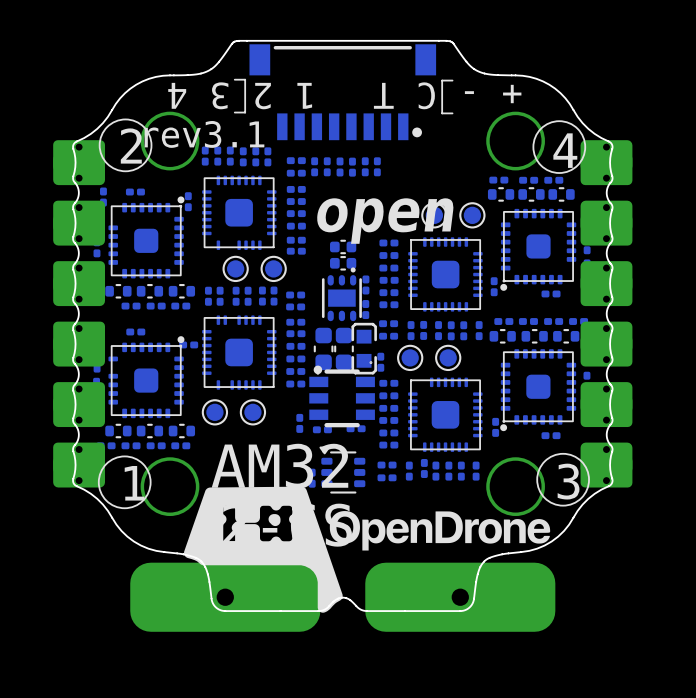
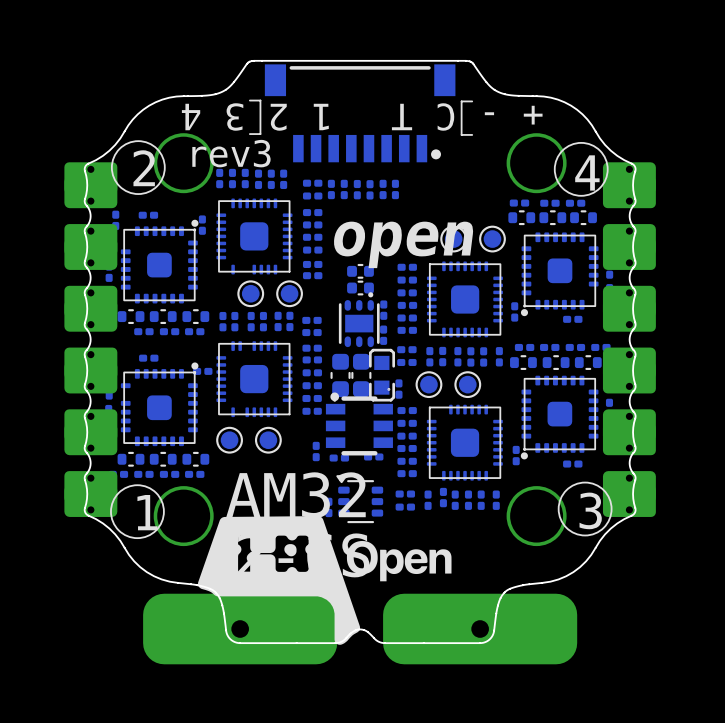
text: rev3.1 (204, 134) -> rev3 (231, 153)
drawing: [435, 511, 551, 544] -> none

